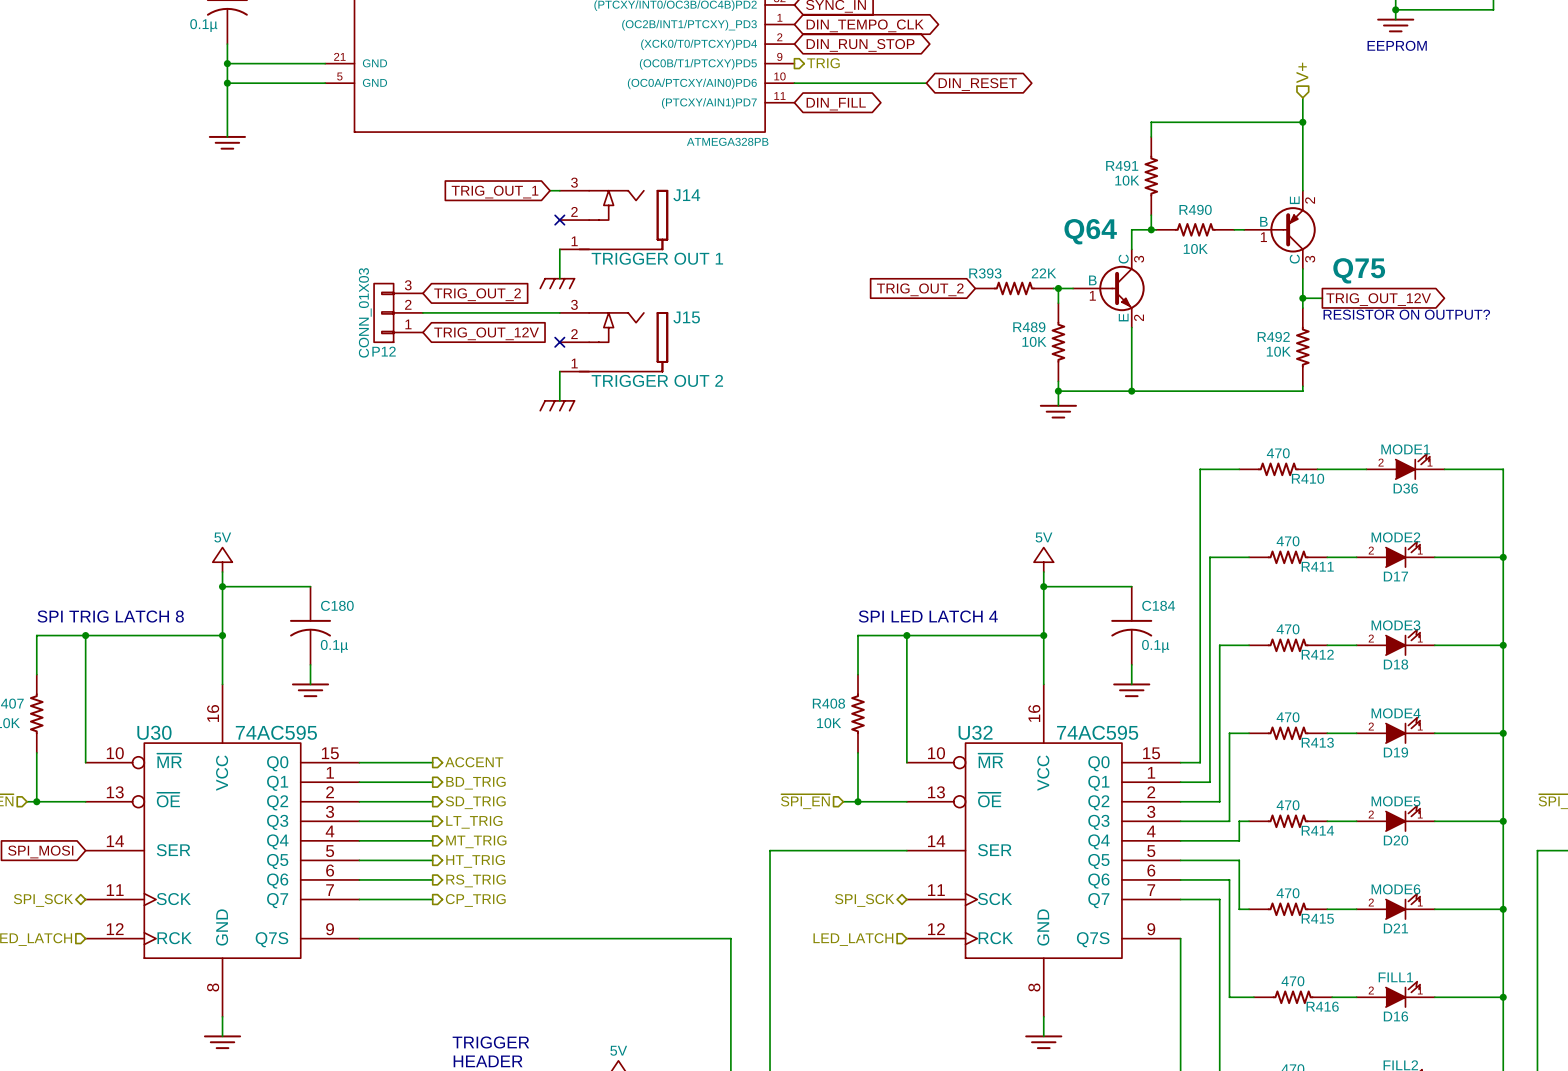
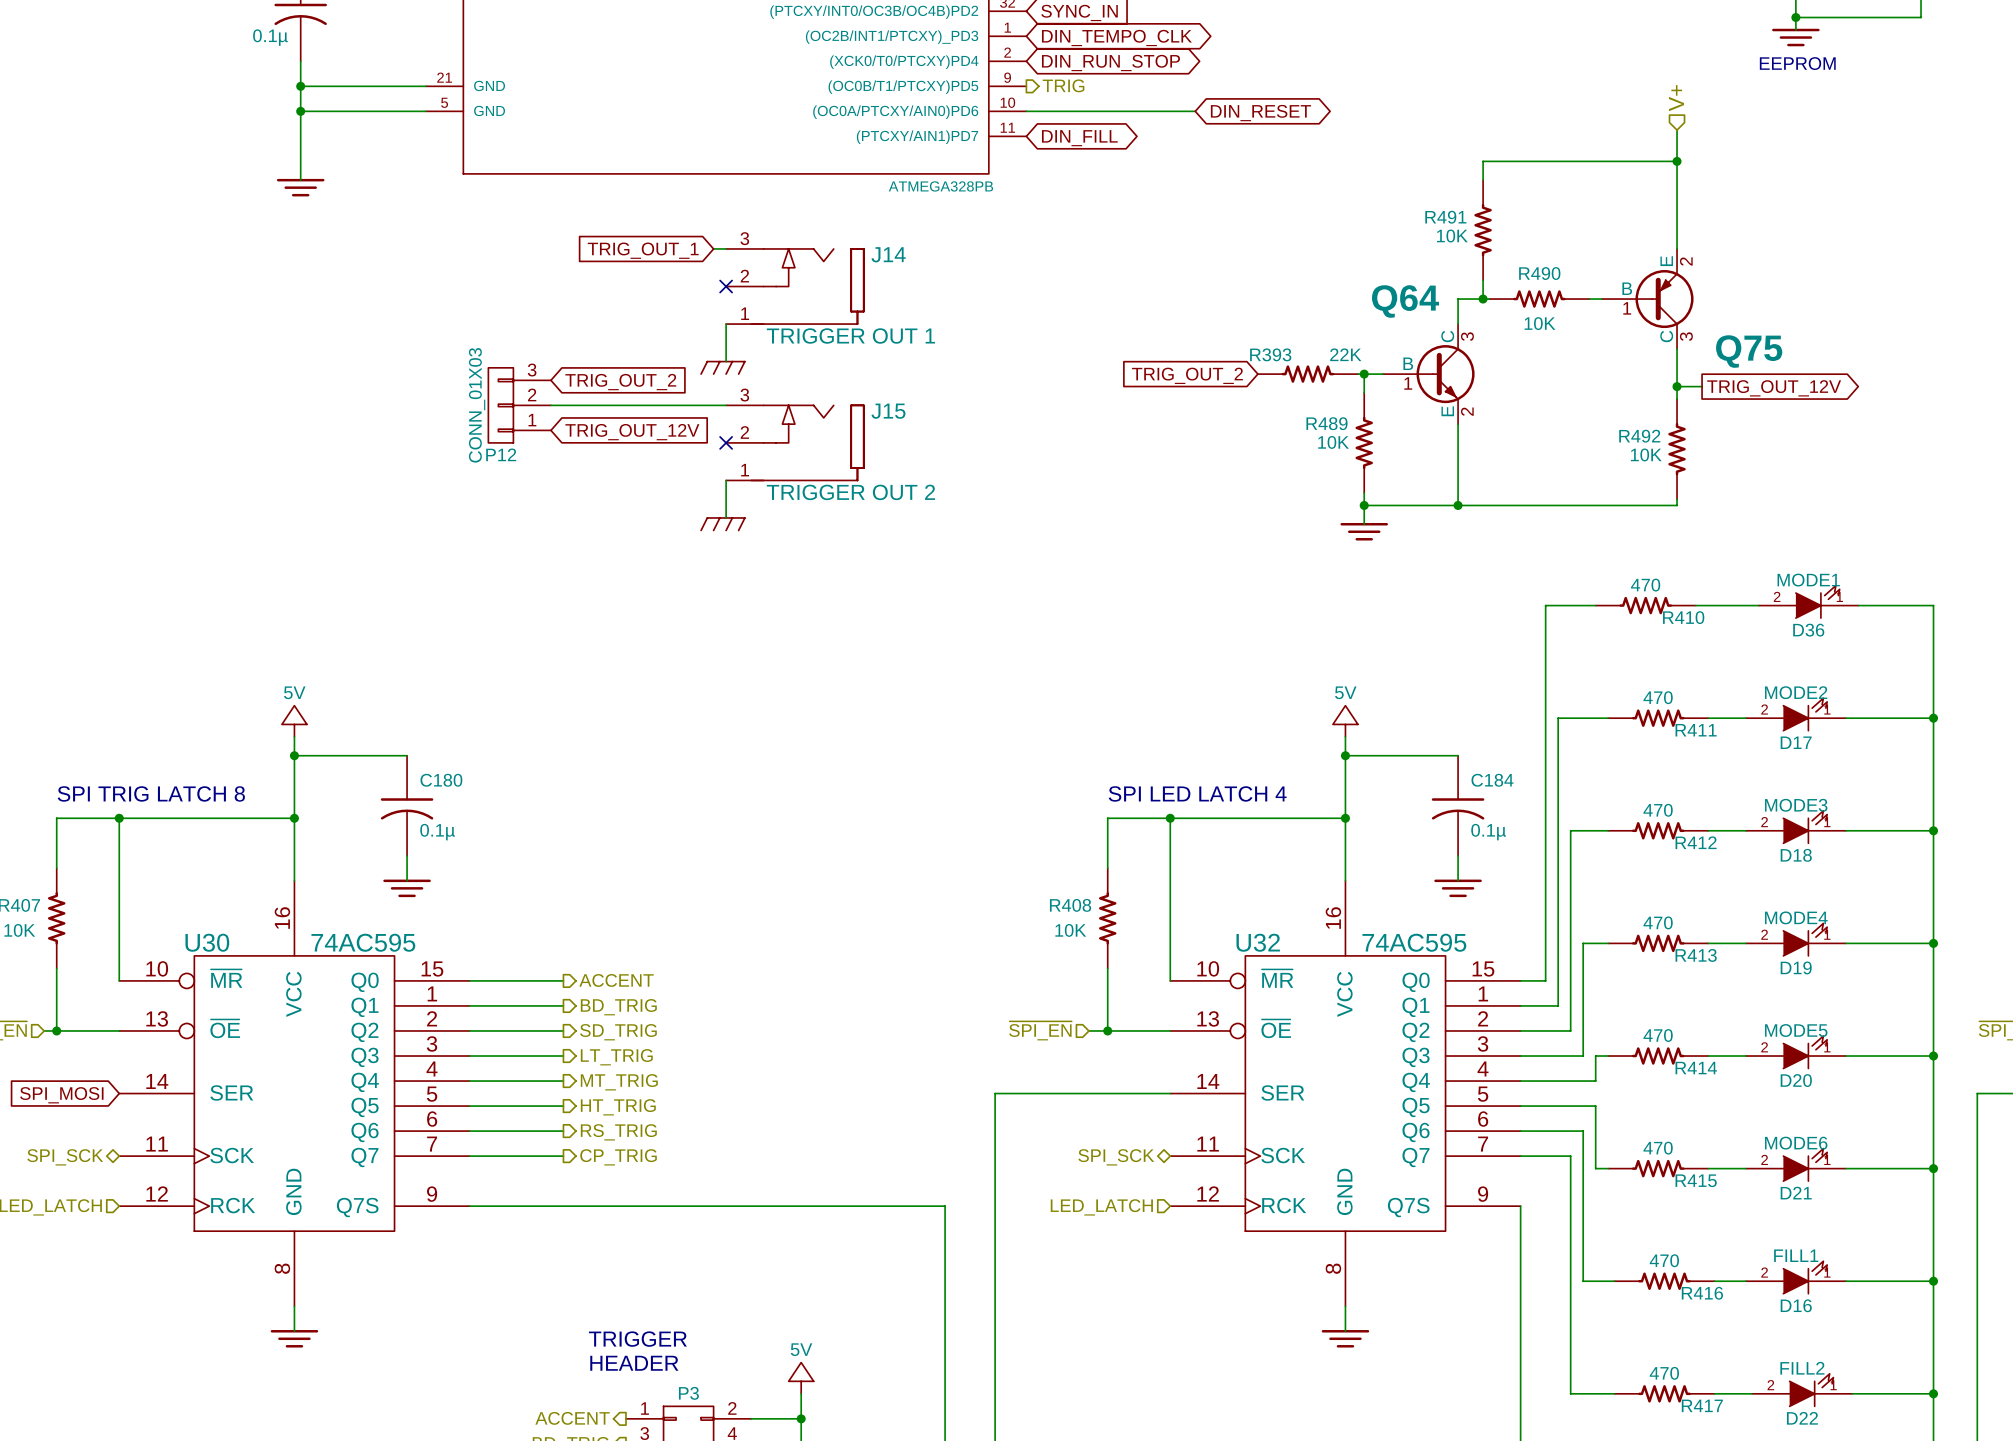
text: RESISTOR ON OUTPUT? (1406, 314) -> none

